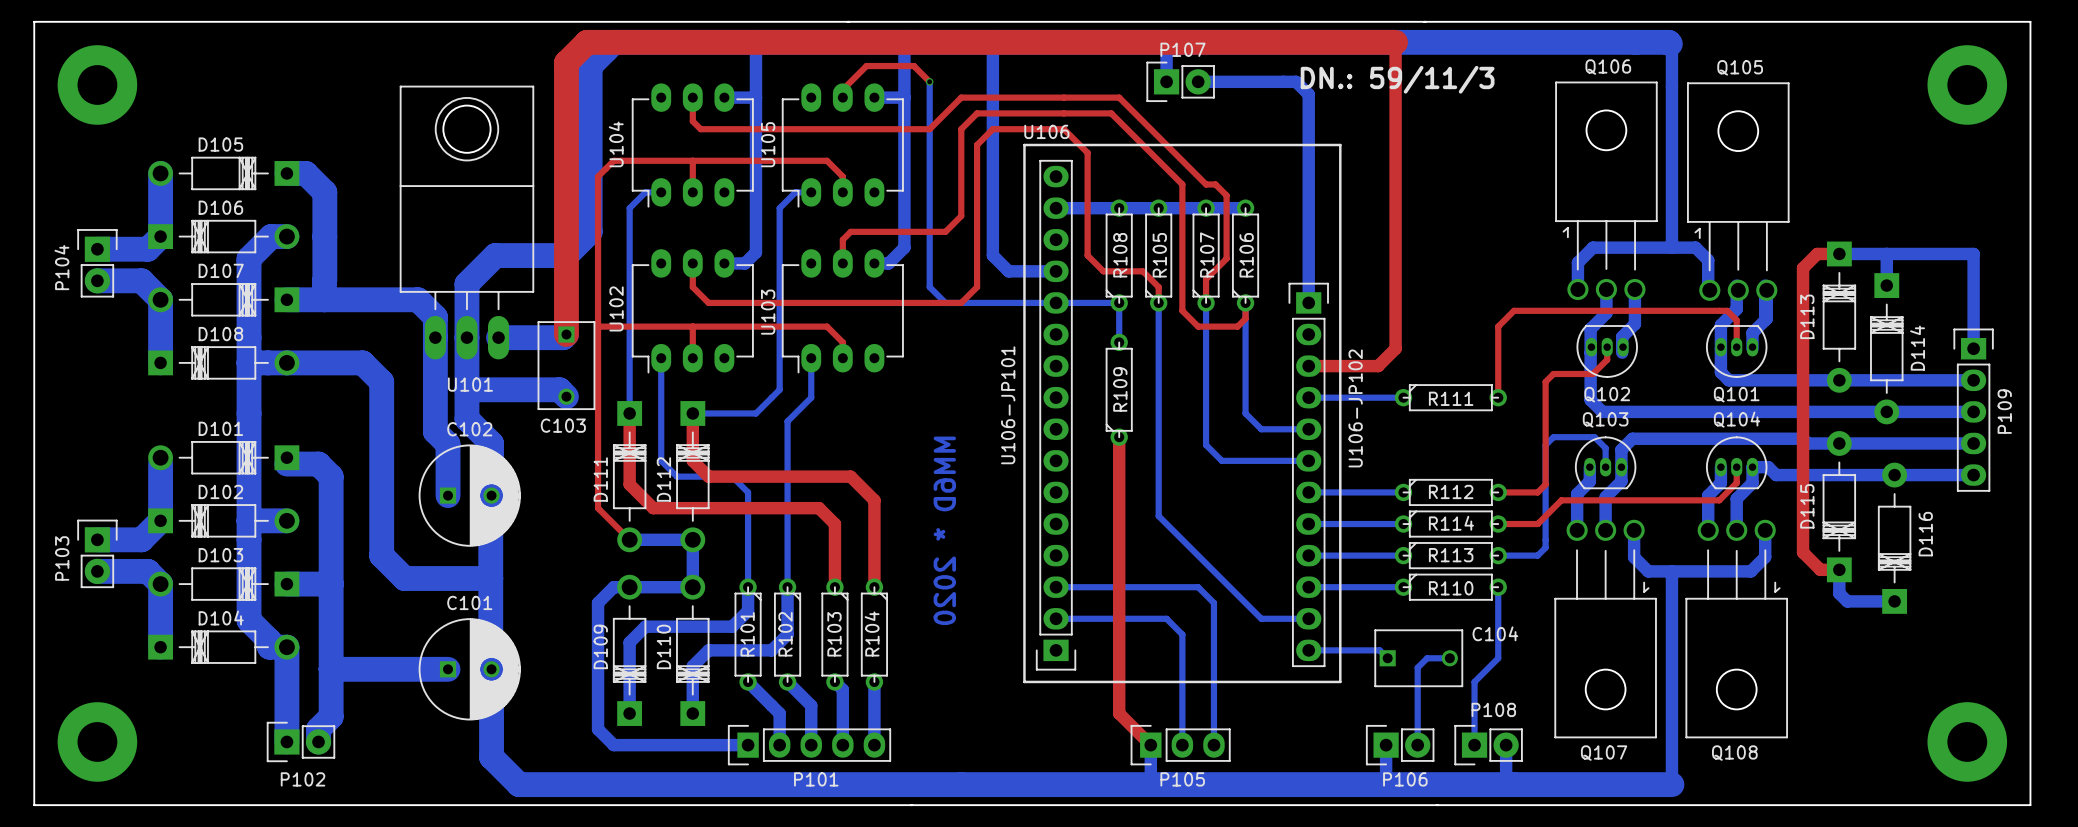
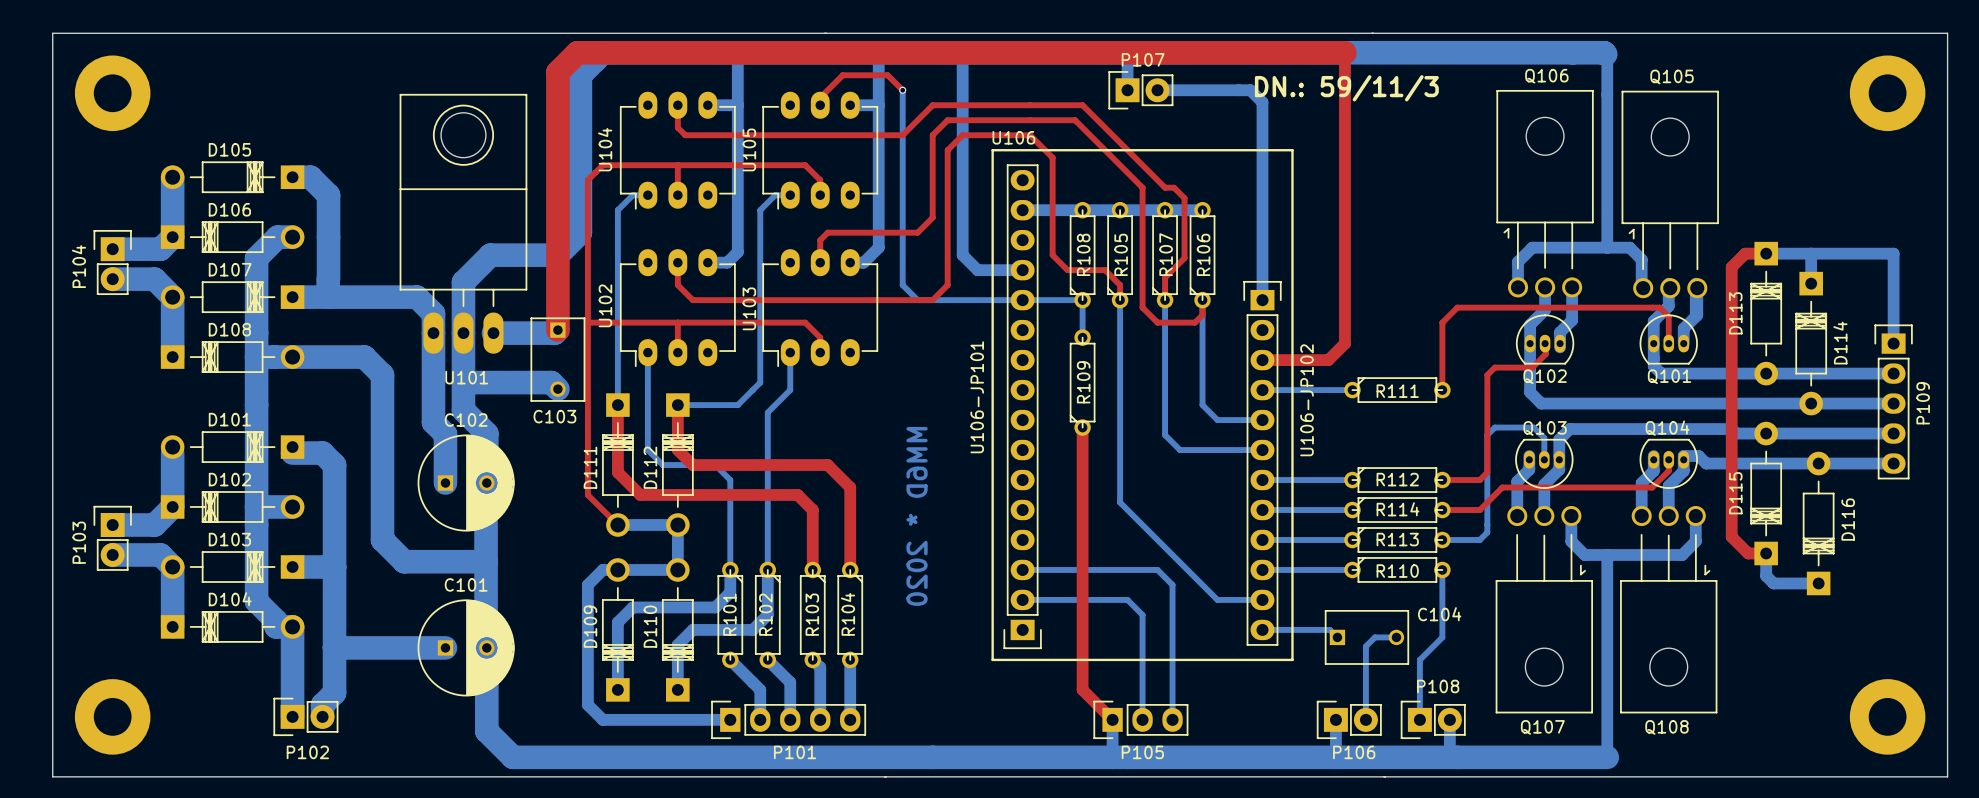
Q102 rotation: 0° (1607, 351) -> 180° (1545, 339)
Q101 rotation: 0° (1736, 351) -> 180° (1668, 339)
Q103 rotation: 0° (1605, 462) -> 180° (1544, 463)
Q104 rotation: 0° (1736, 462) -> 180° (1668, 463)

